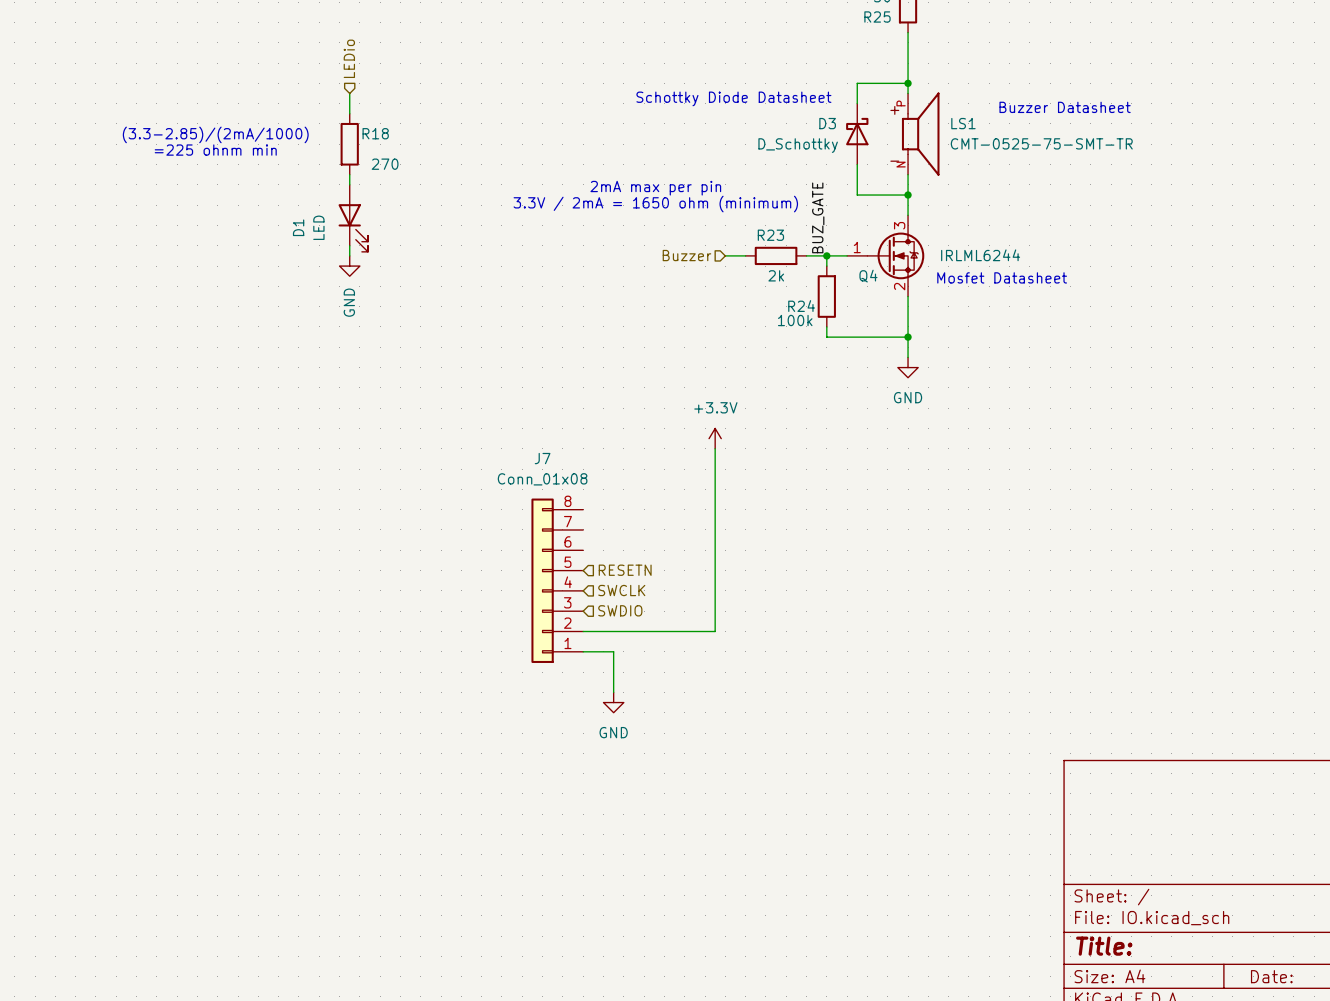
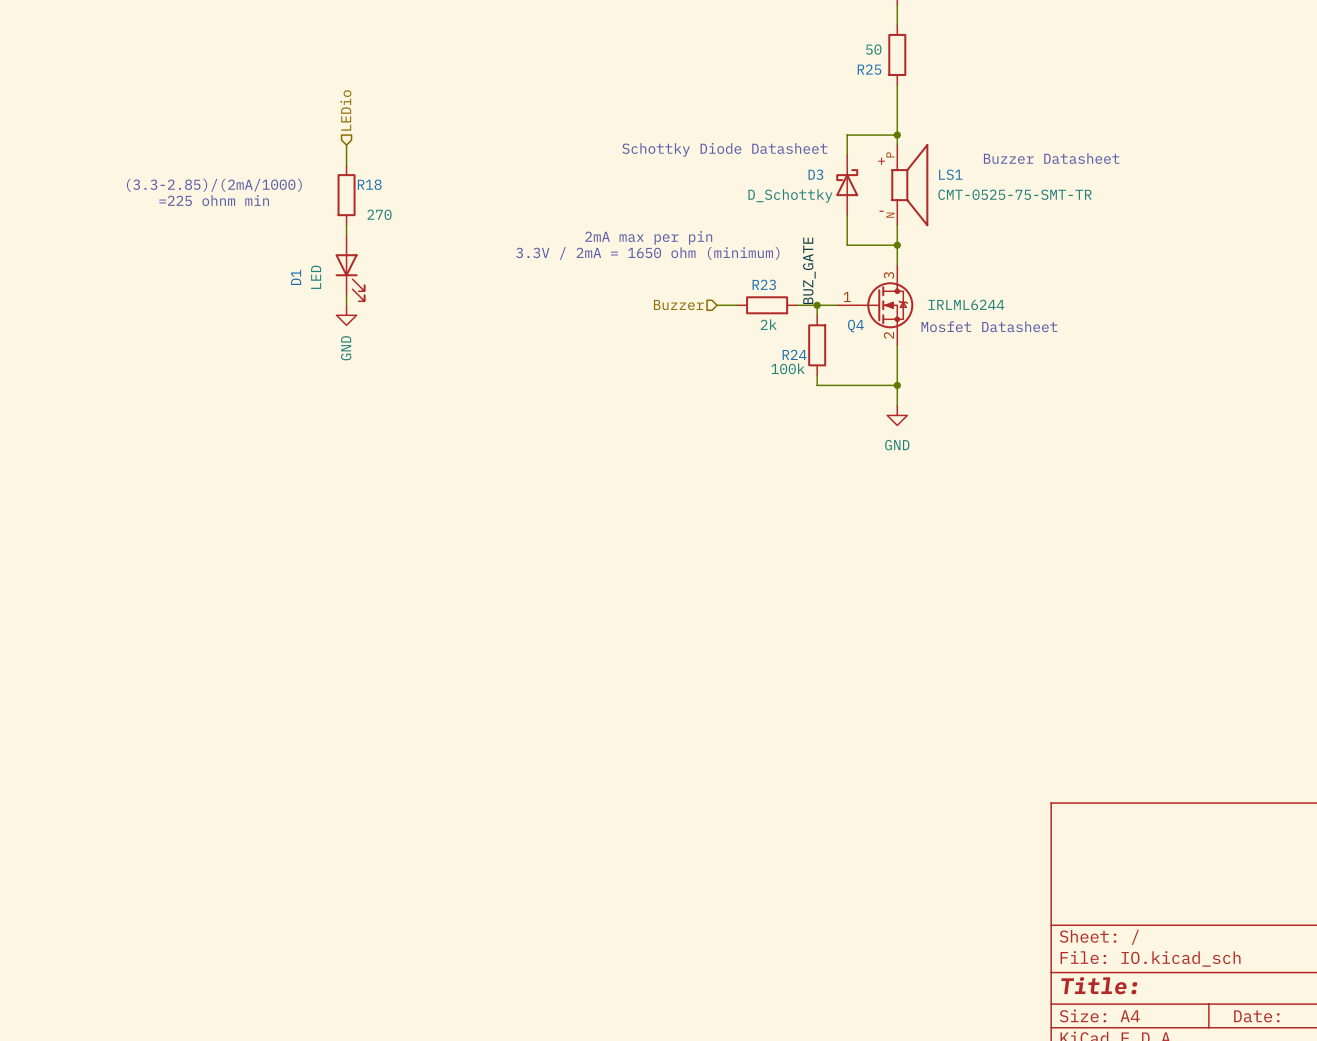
power symbol: +3.3V (715, 438) -> none
wire: (715, 448) (715, 631) (583, 631) -> none
hierarchical label: RESETN (625, 570) -> none
J7: Conn_01x08 (557, 580) -> none
hierarchical label: SWCLK (621, 590) -> none
hierarchical label: SWDIO (620, 610) -> none
wire: (583, 651) (613, 651) (613, 692) -> none
power symbol: GND (613, 702) -> none

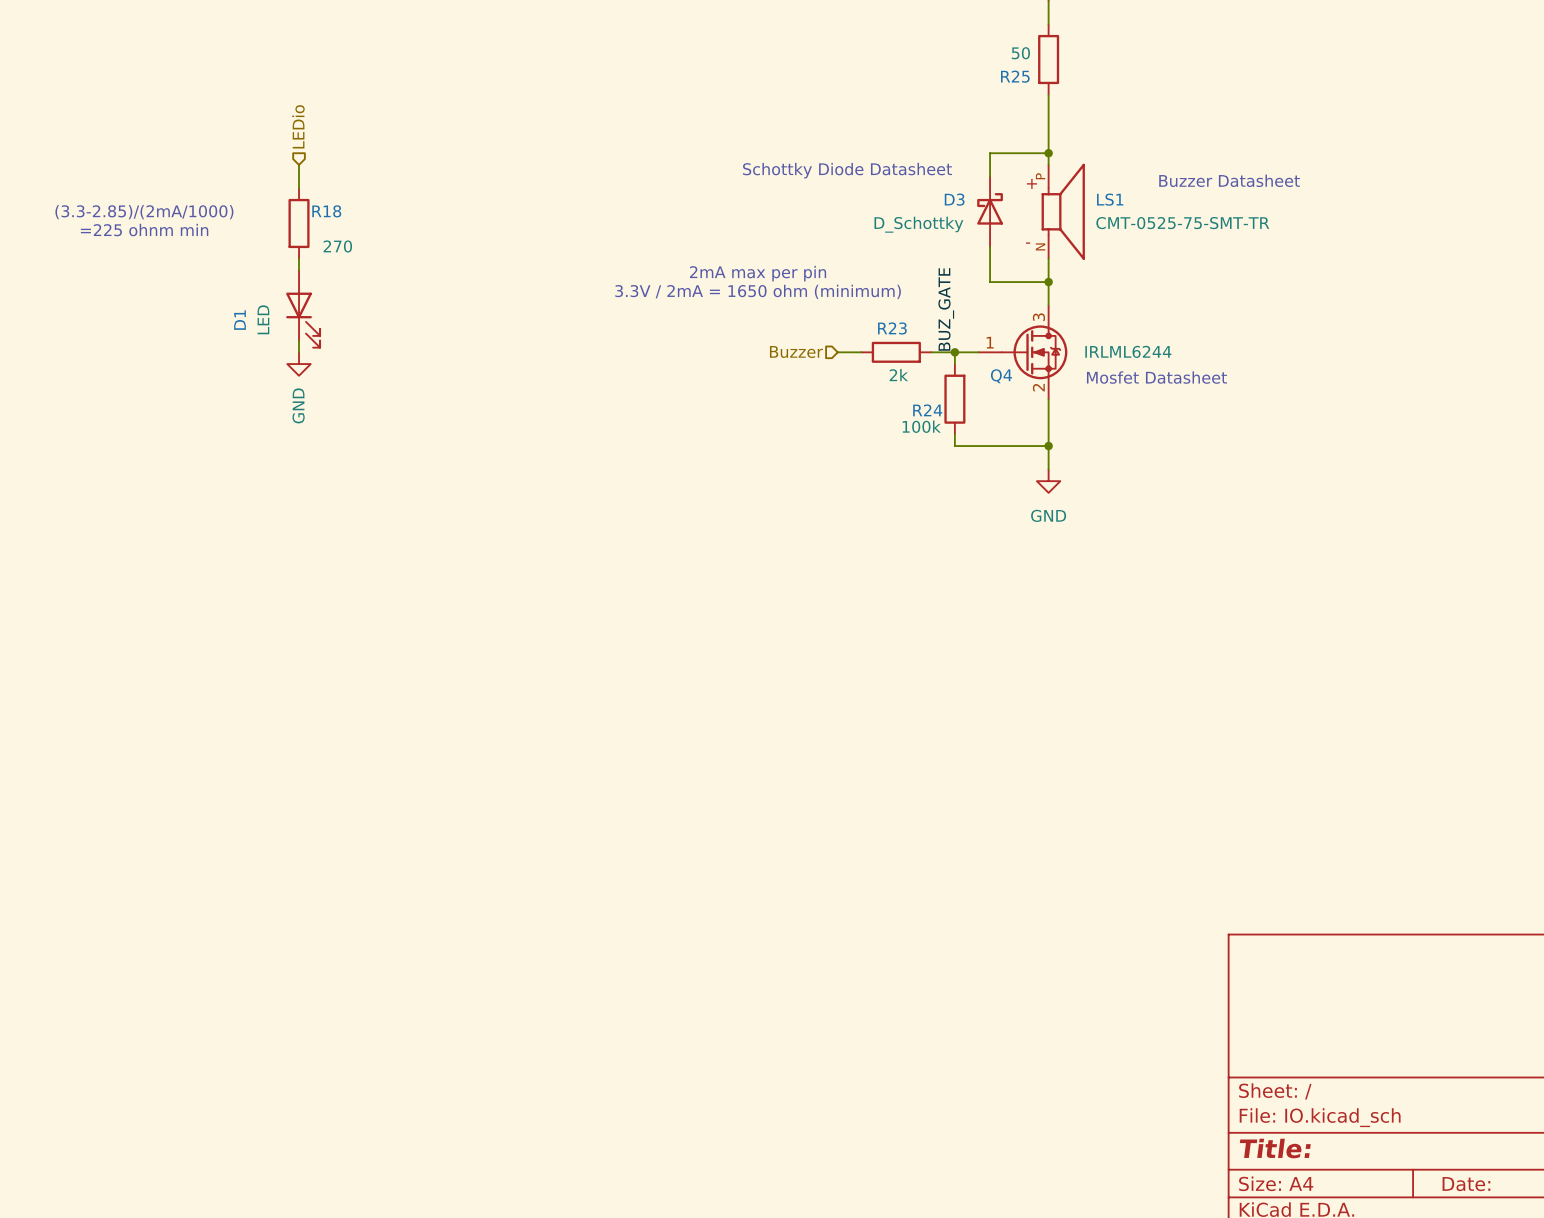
hierarchical label position: LEDio (345, 110) -> LEDio (298, 126)
wire: (346, 145) (346, 165) -> (299, 164) (299, 188)
text position: (3.3-2.85)/(2mA/1000) (214, 185) -> (3.3-2.85)/(2mA/1000) (144, 212)
R18 position: (346, 195) -> (299, 223)
text position: =225 ohnm min (214, 200) -> =225 ohnm min (144, 230)
wire: (346, 225) (346, 235) -> (299, 258) (299, 270)
D1 position: (350, 268) -> (303, 308)
wire: (346, 295) (346, 305) -> (299, 340) (299, 352)
power symbol position: GND (346, 315) -> GND (299, 364)

